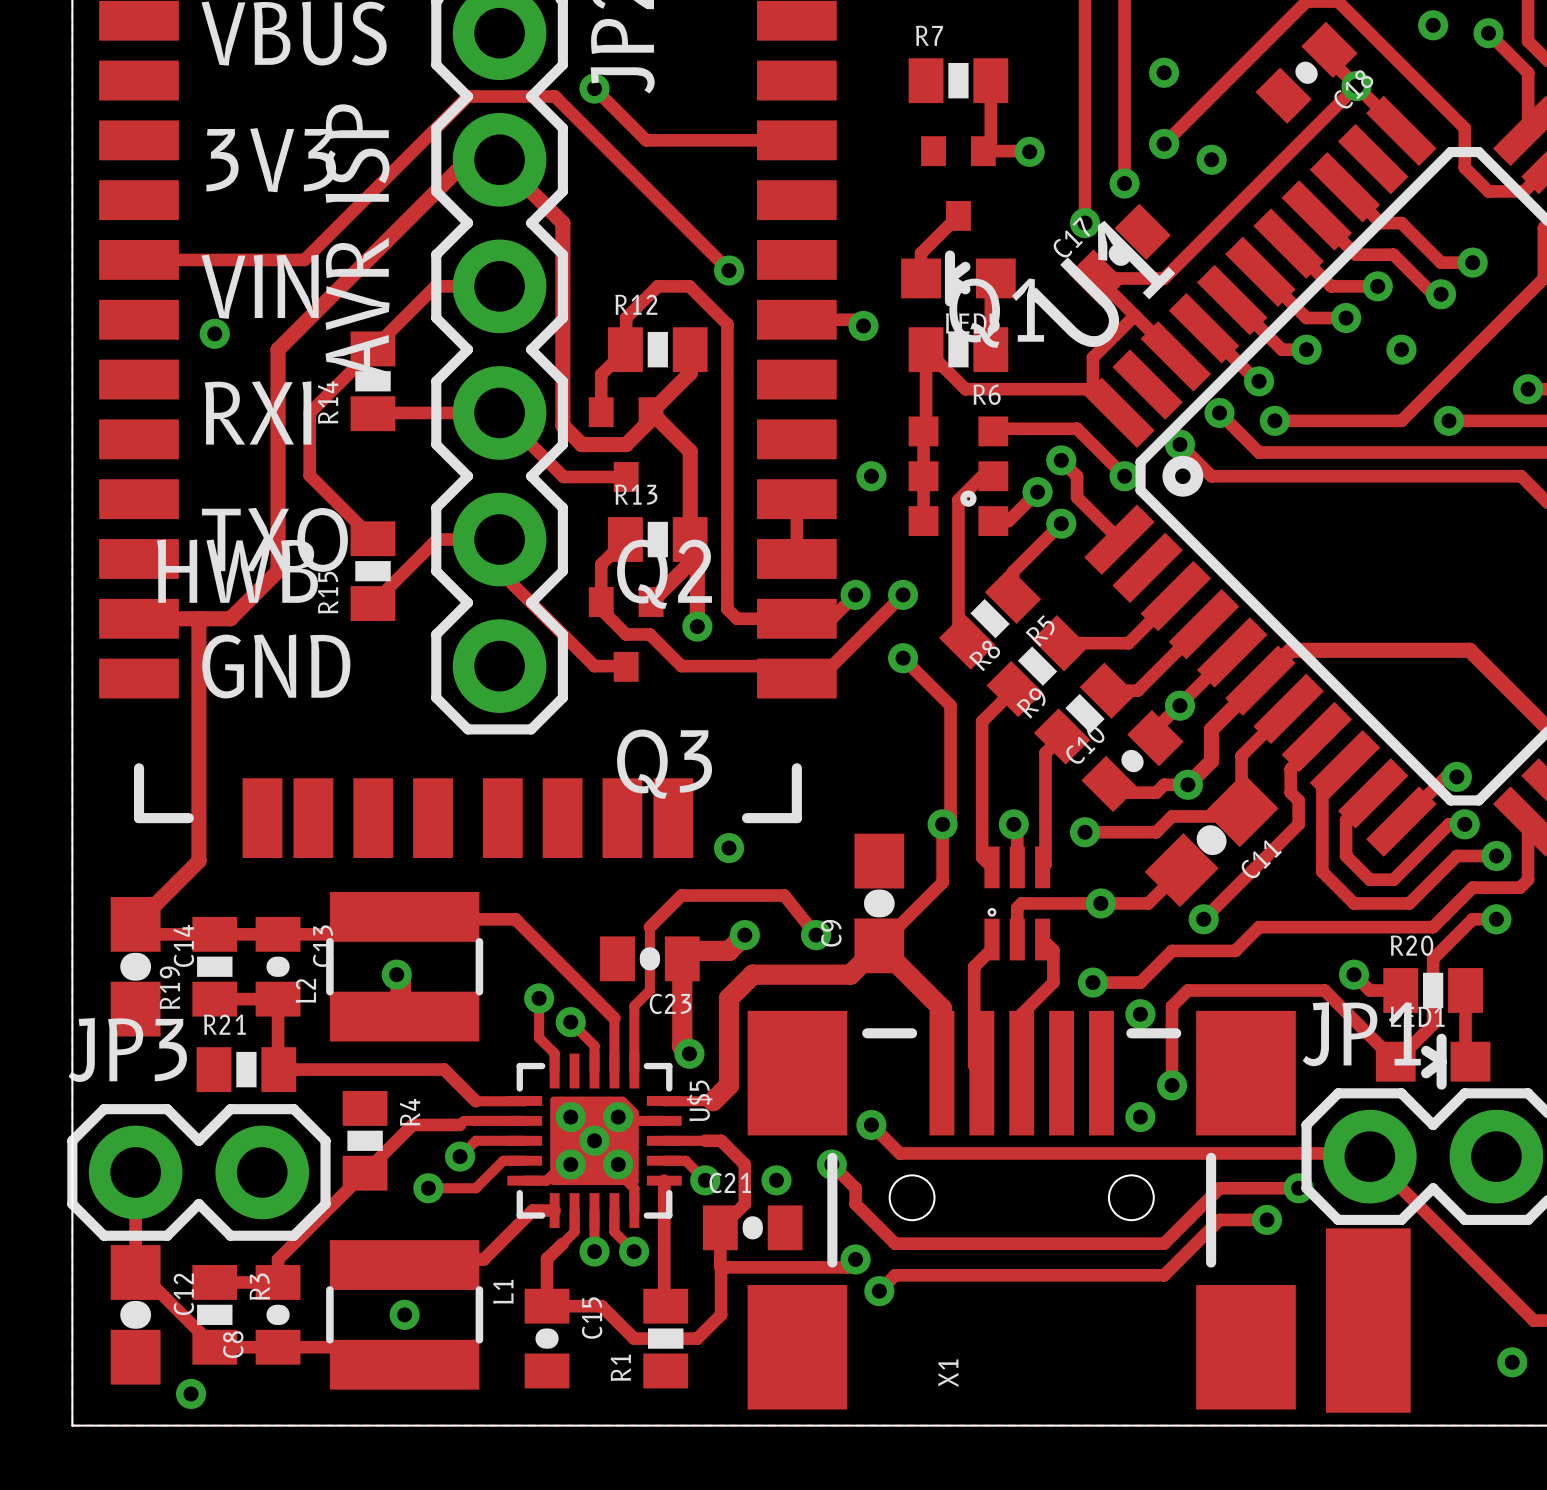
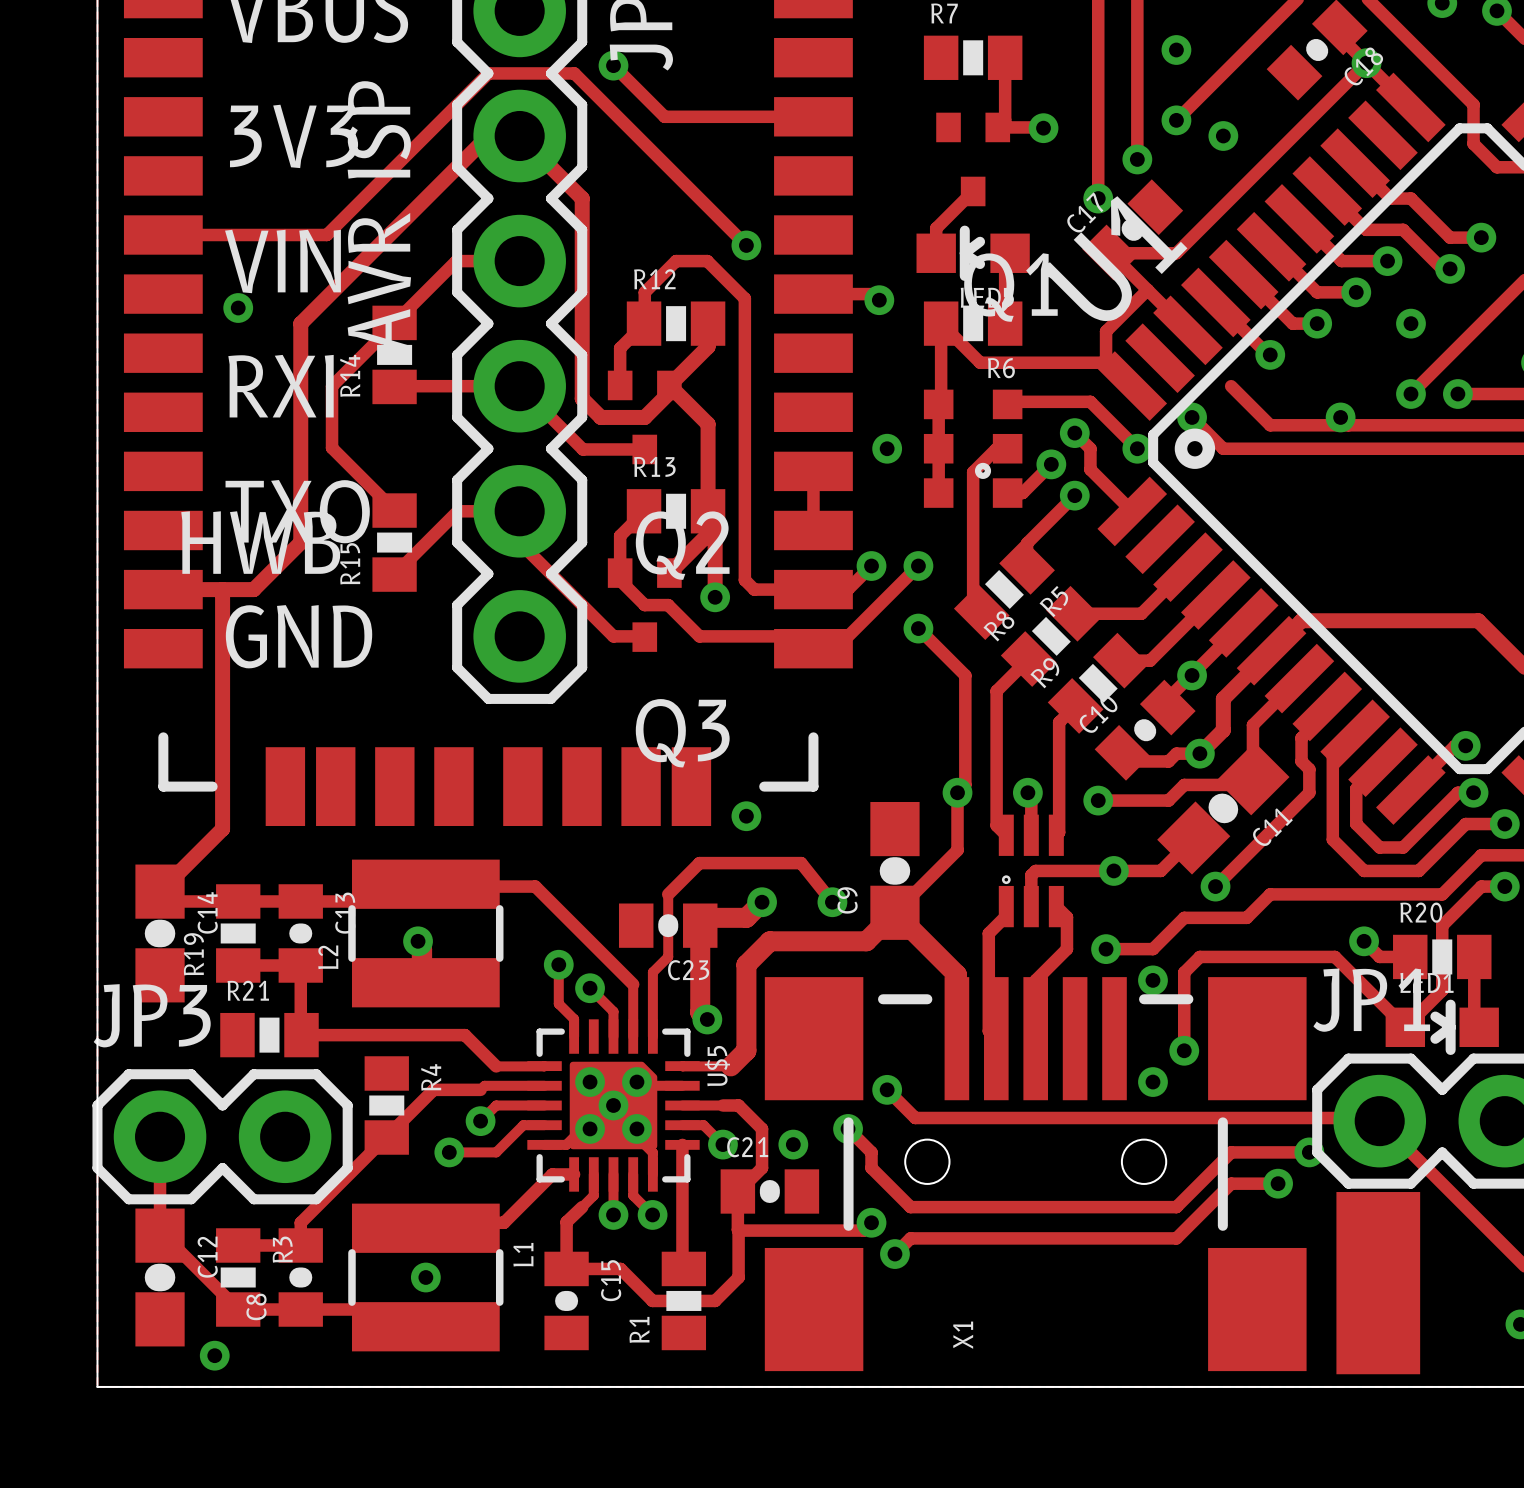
via: (1219, 412) -> none
track: (1274, 420) (1401, 420) -> none
via: (1274, 420) -> none
via: none -> (1410, 394)
via: none -> (1340, 417)

